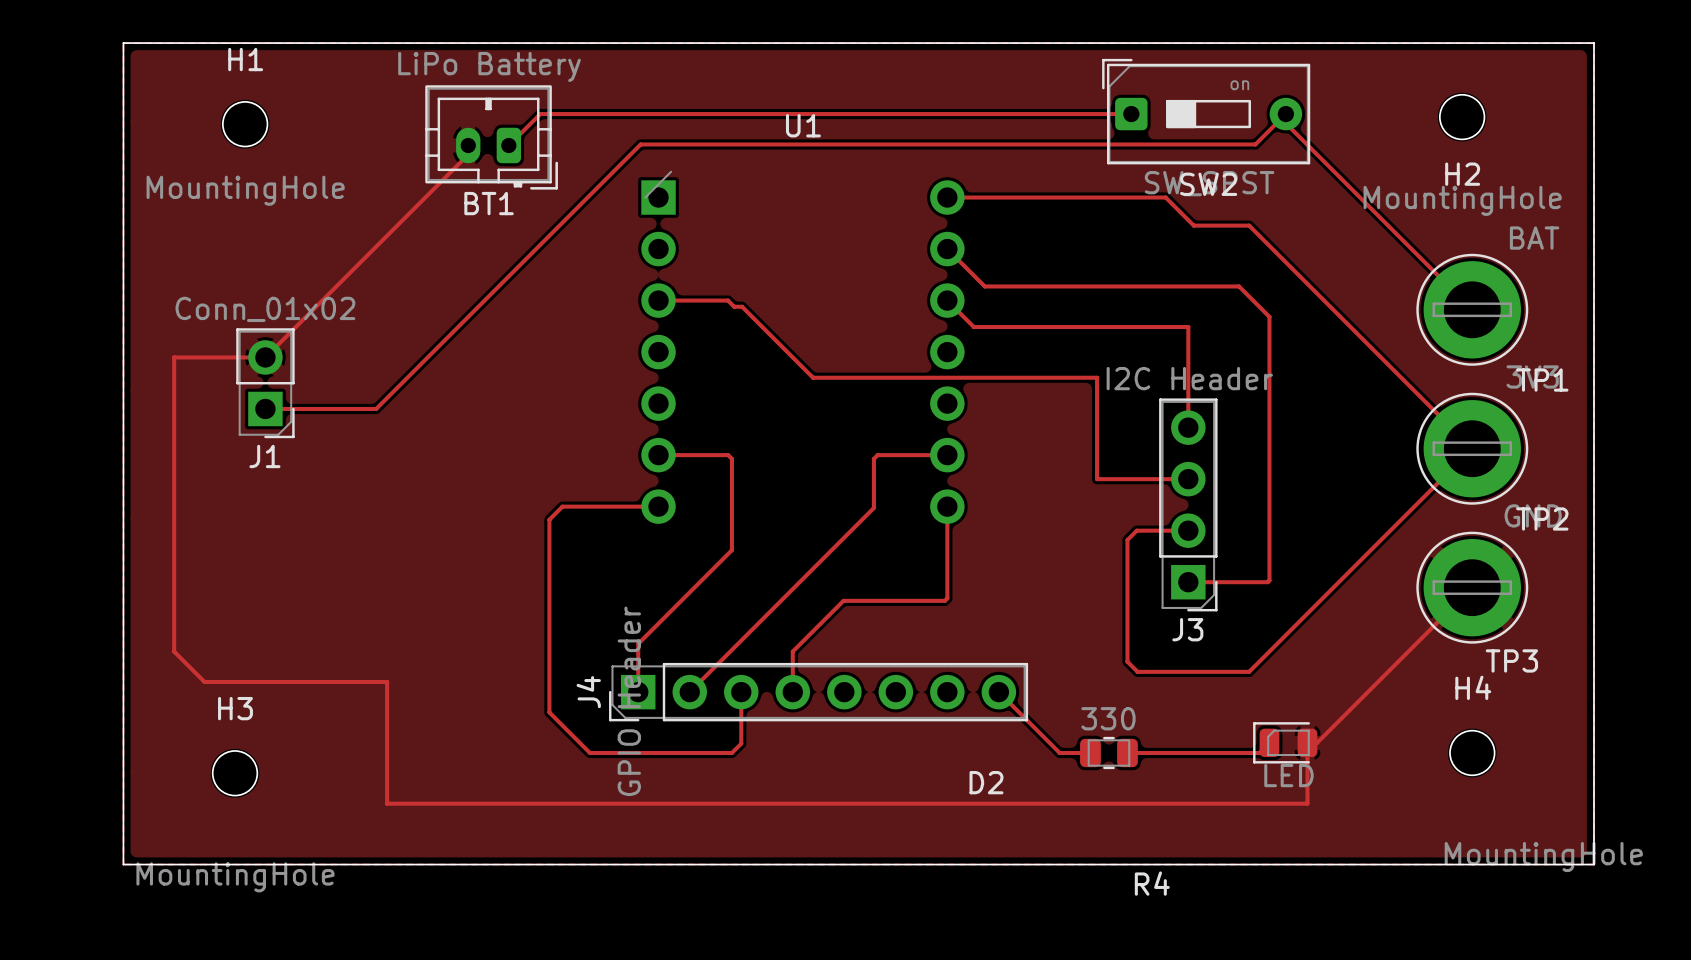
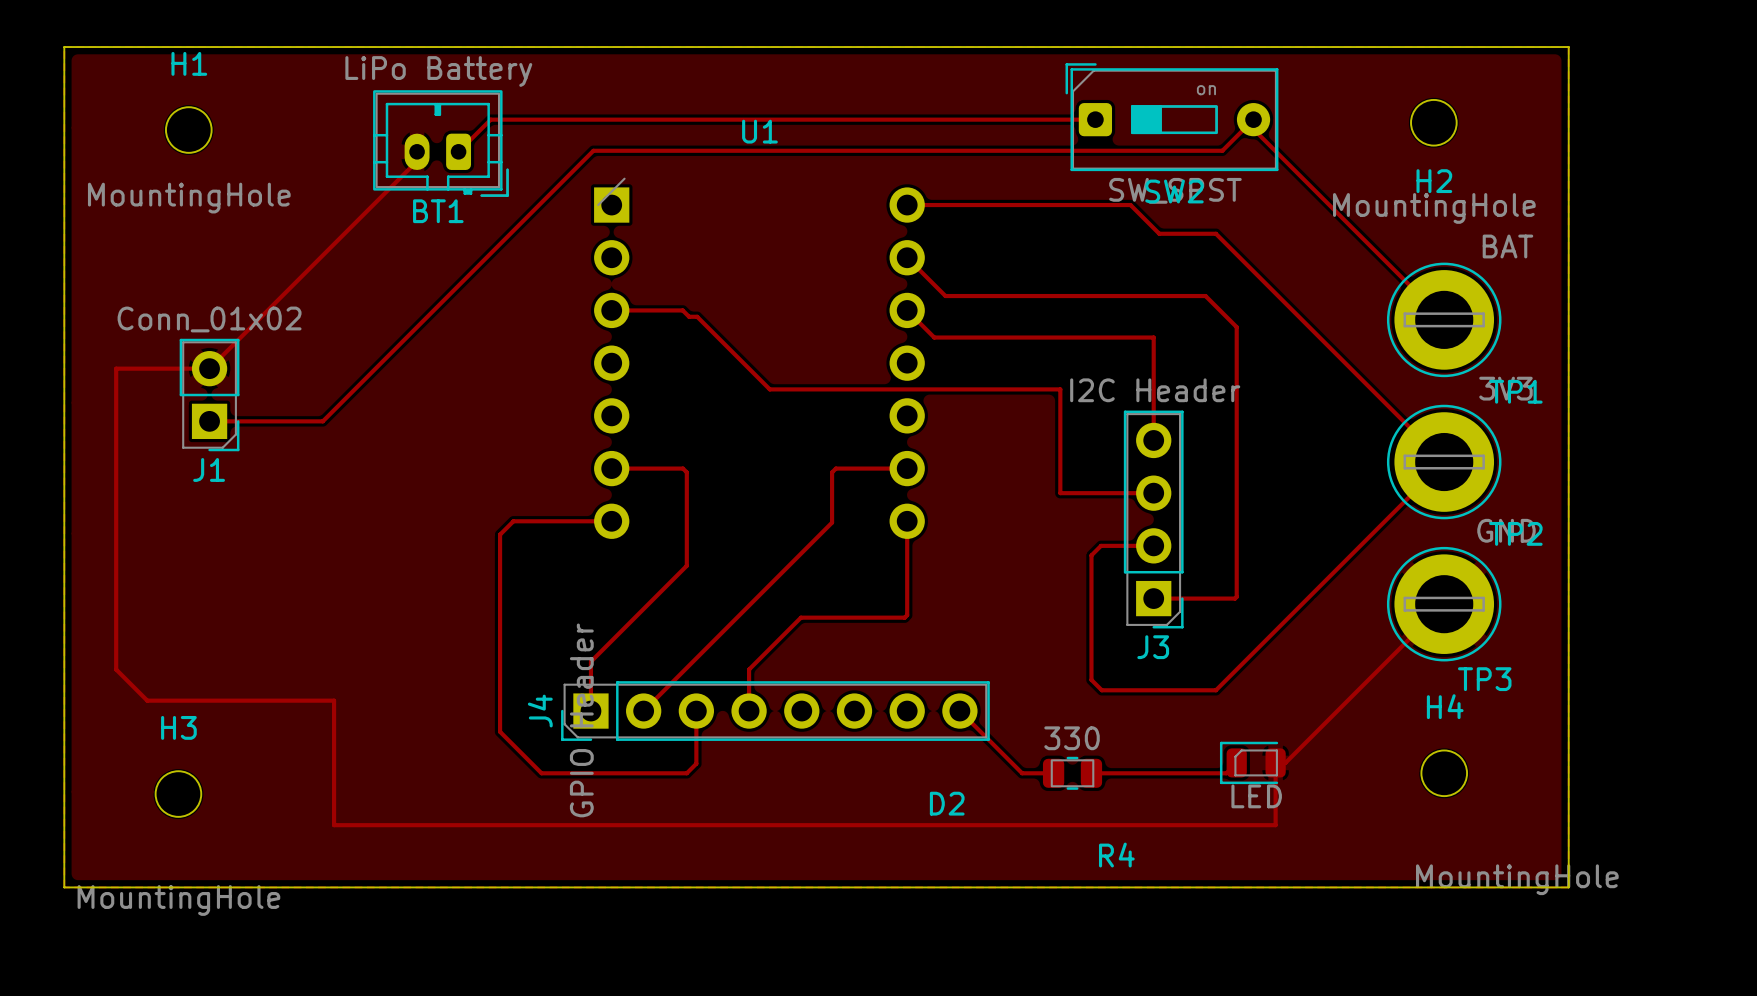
R4 name position: R4 (1152, 883) -> R4 (1116, 855)

